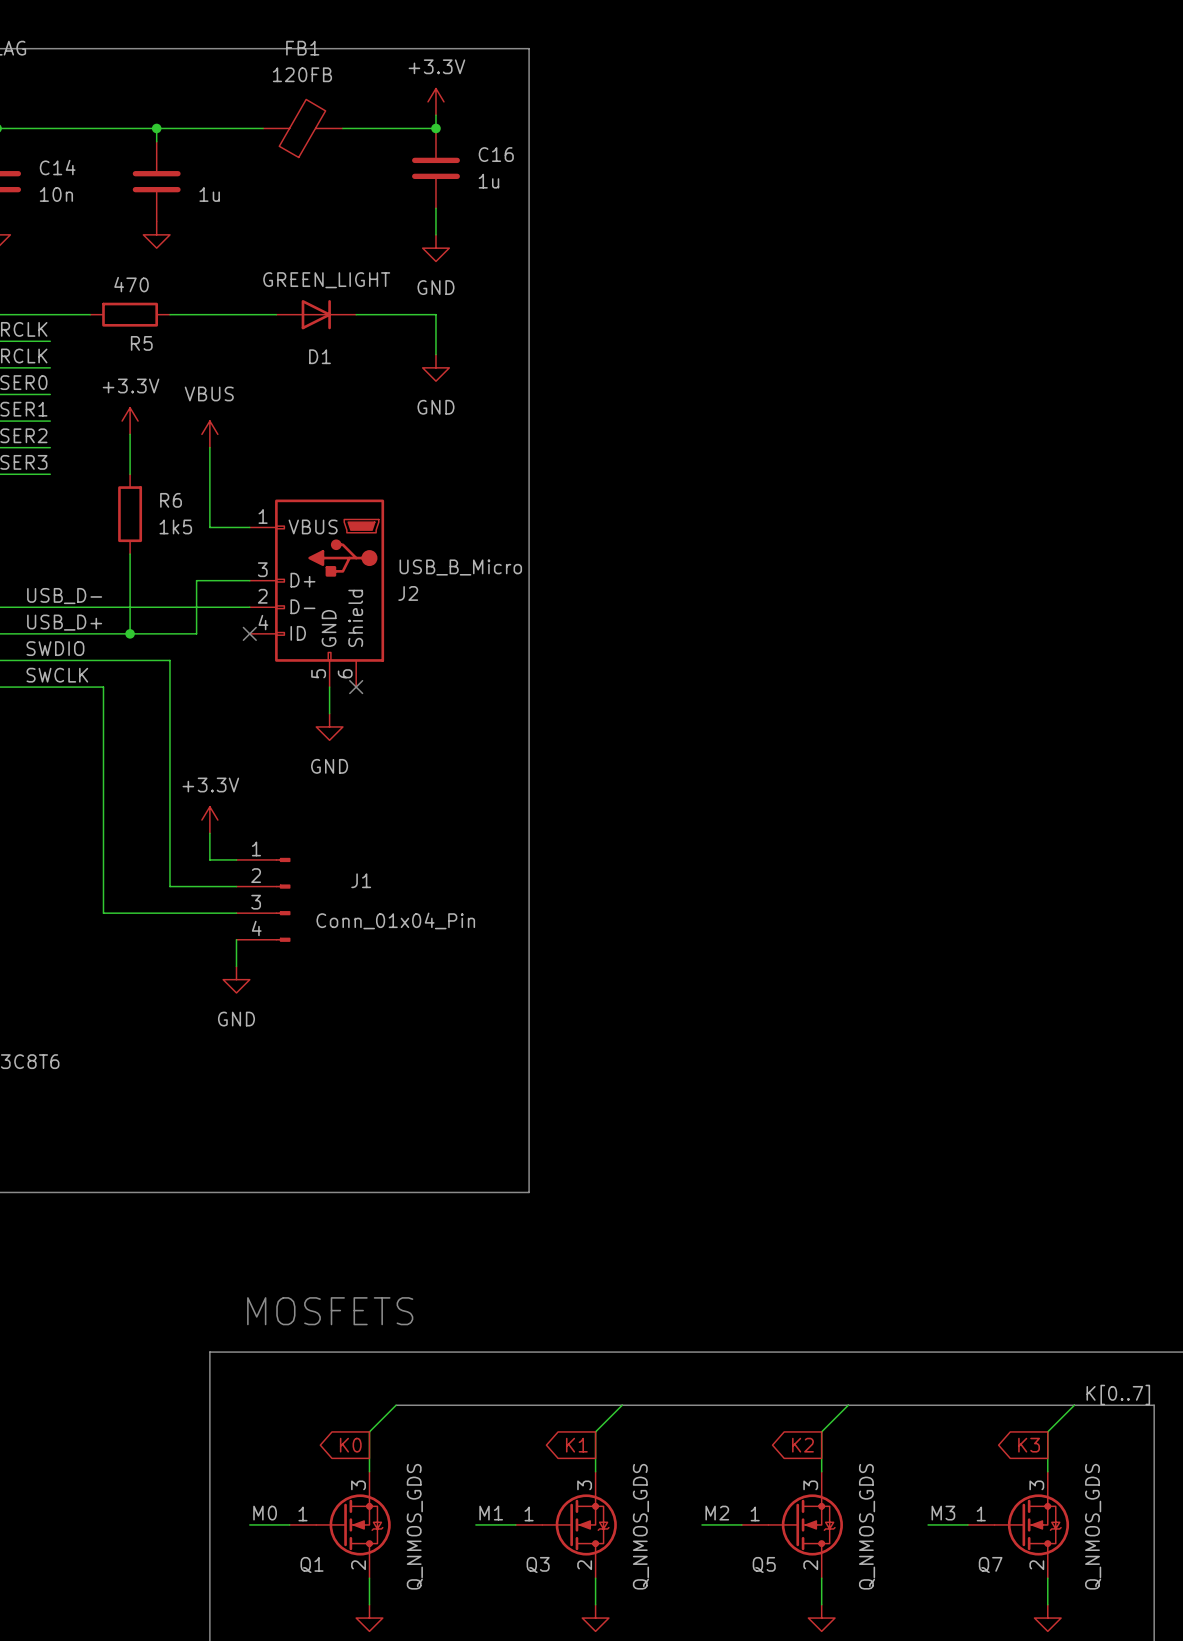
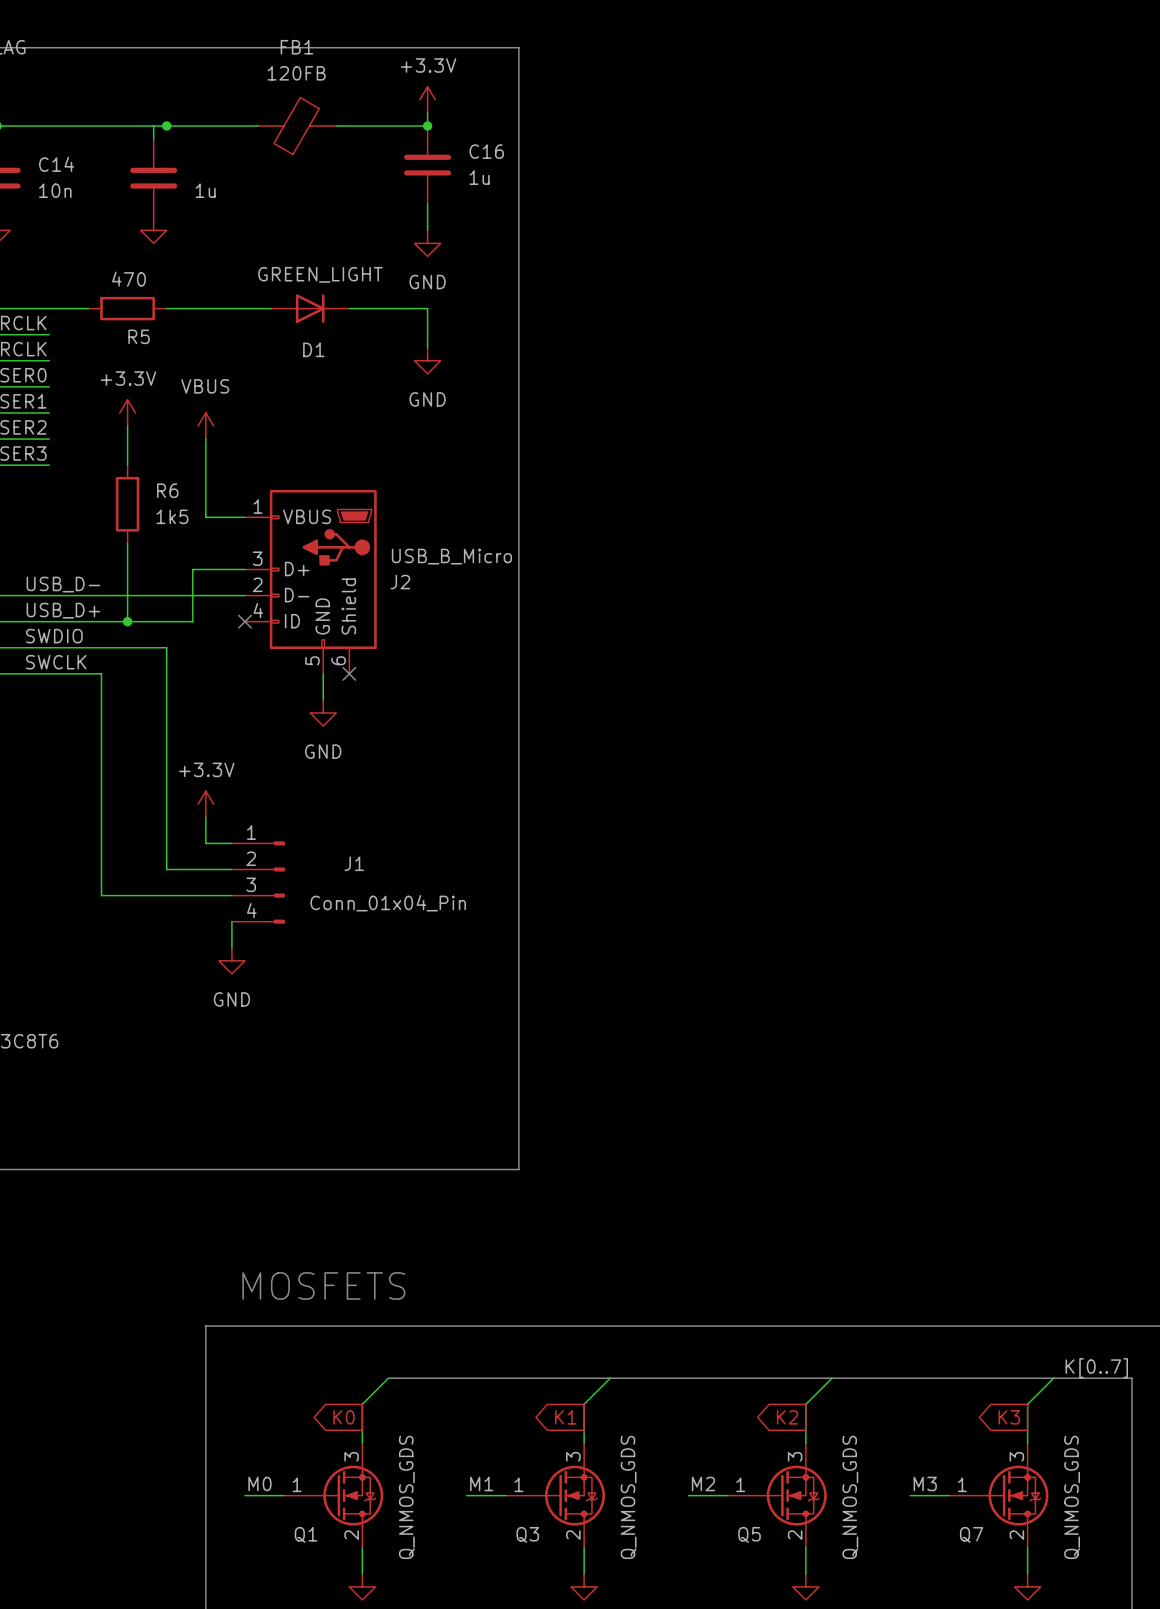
junction position: (156, 128) -> (166, 125)

